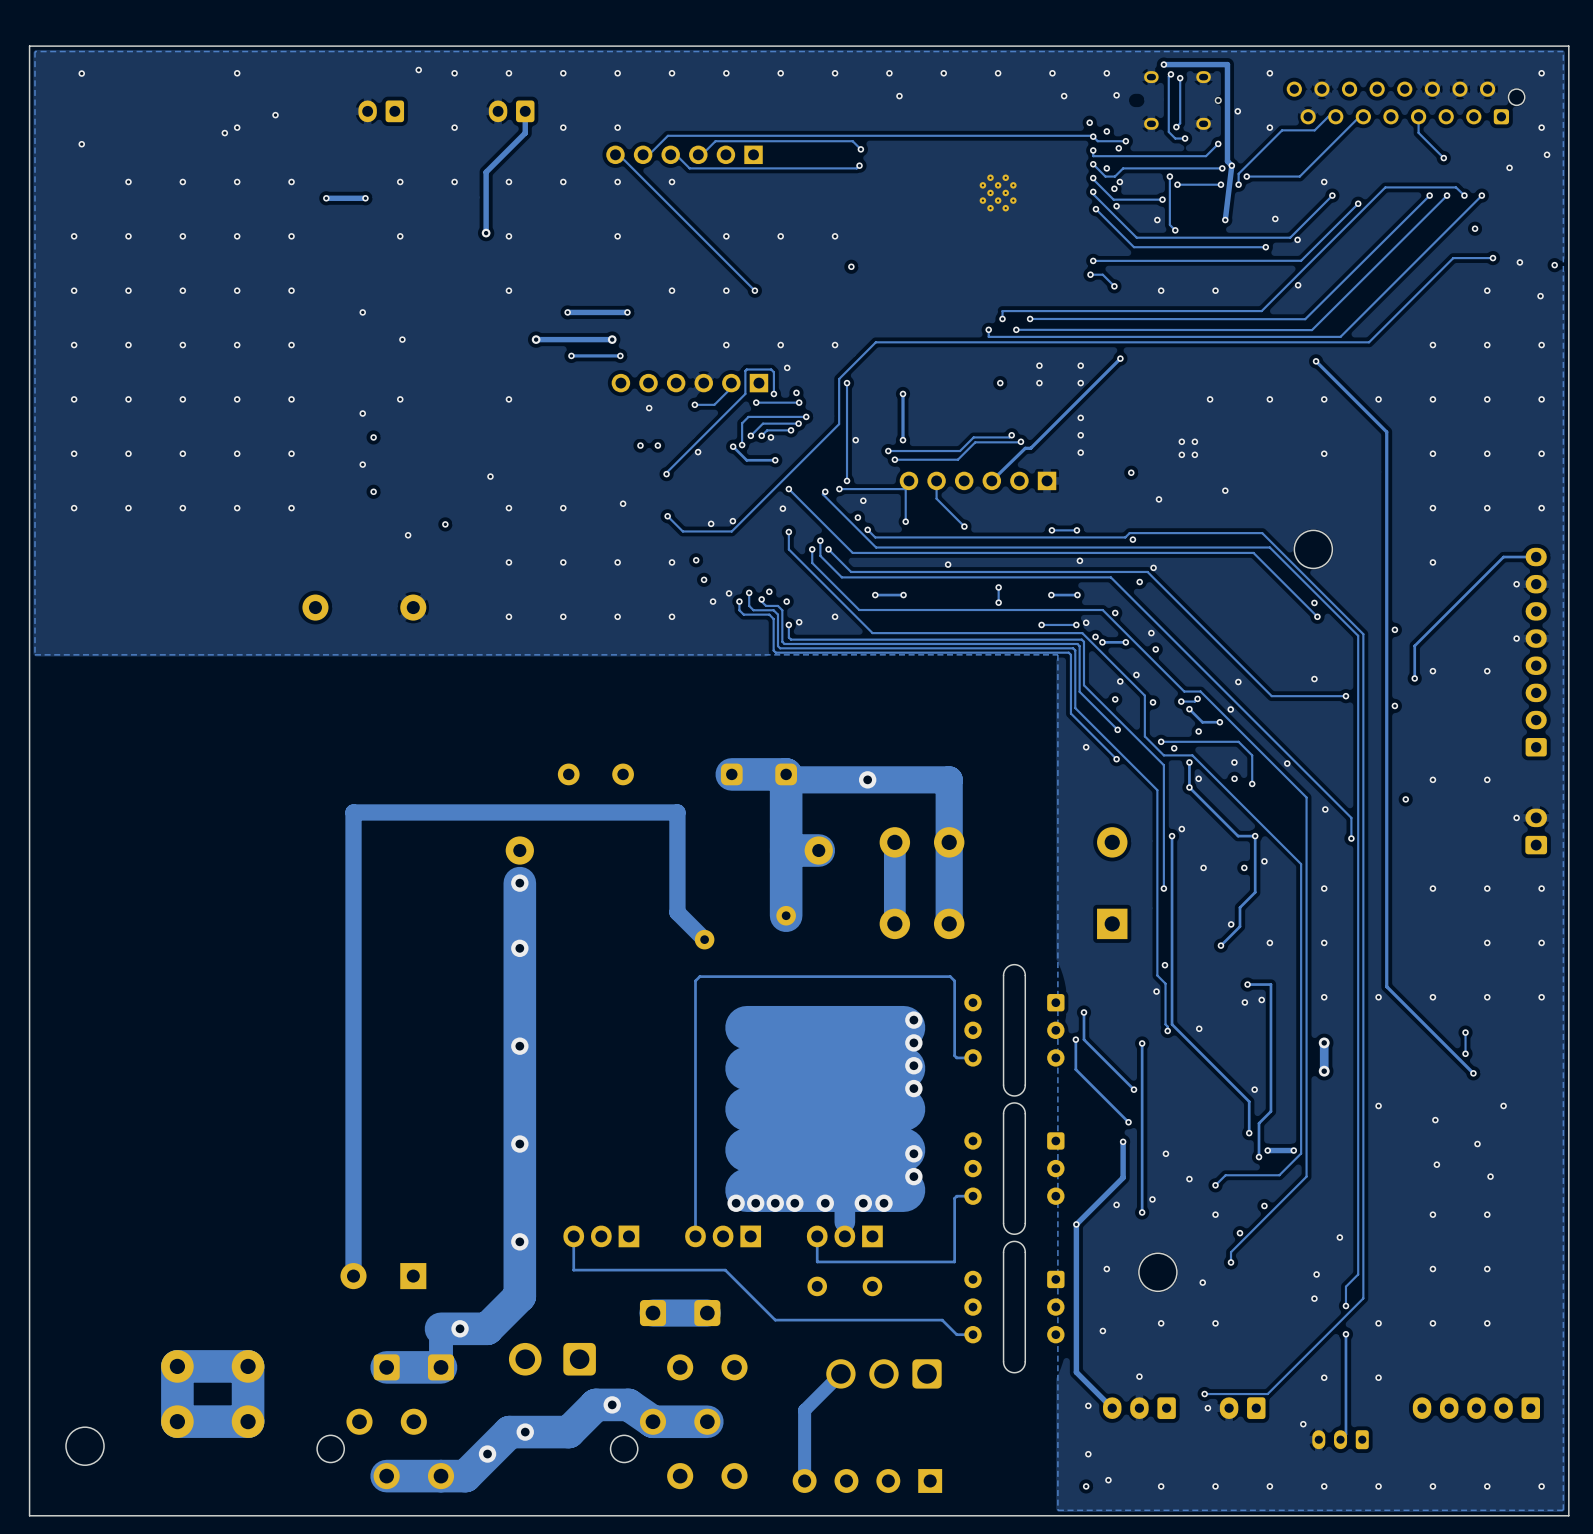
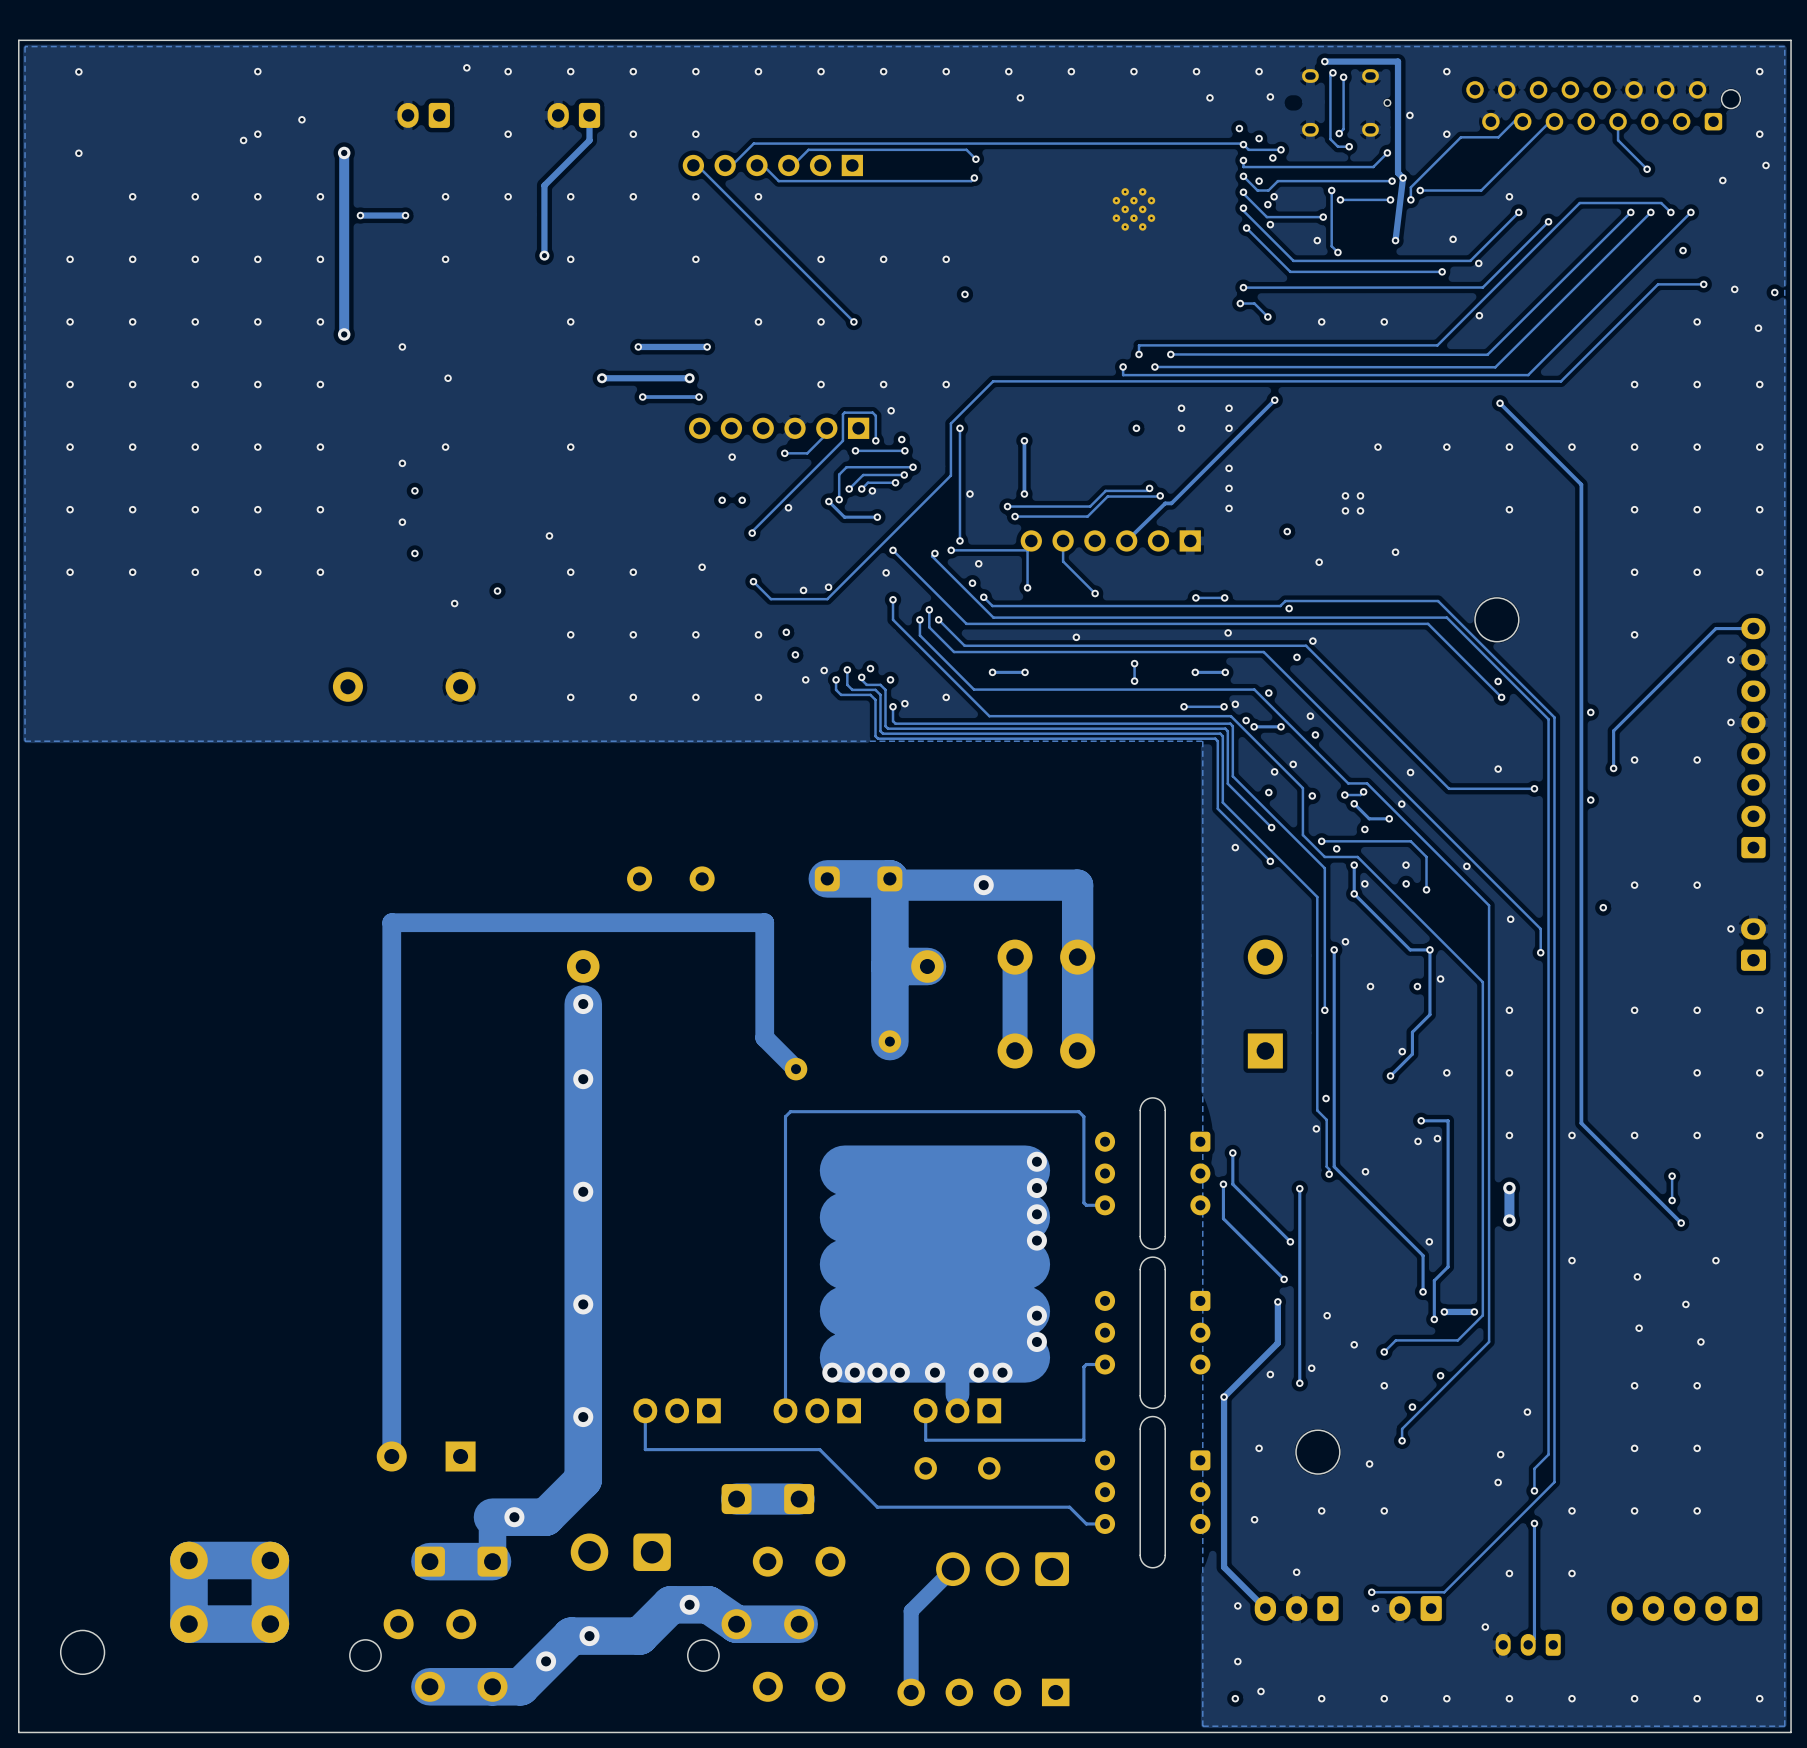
track: none -> (344, 152) (344, 334)
via: none -> (344, 152)
via: none -> (344, 334)

